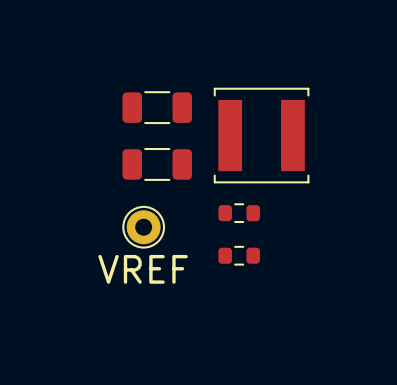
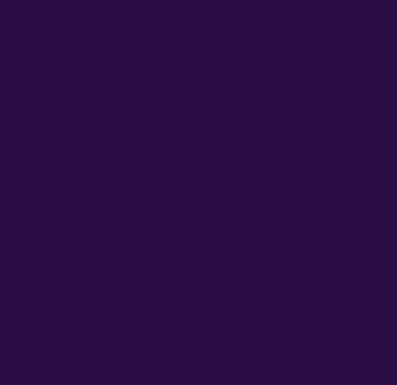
part: (157, 107) -> none
part: (261, 135) -> none
part: (157, 164) -> none
part: (239, 213) -> none
part: VREF (143, 227) -> none
part: (239, 255) -> none

